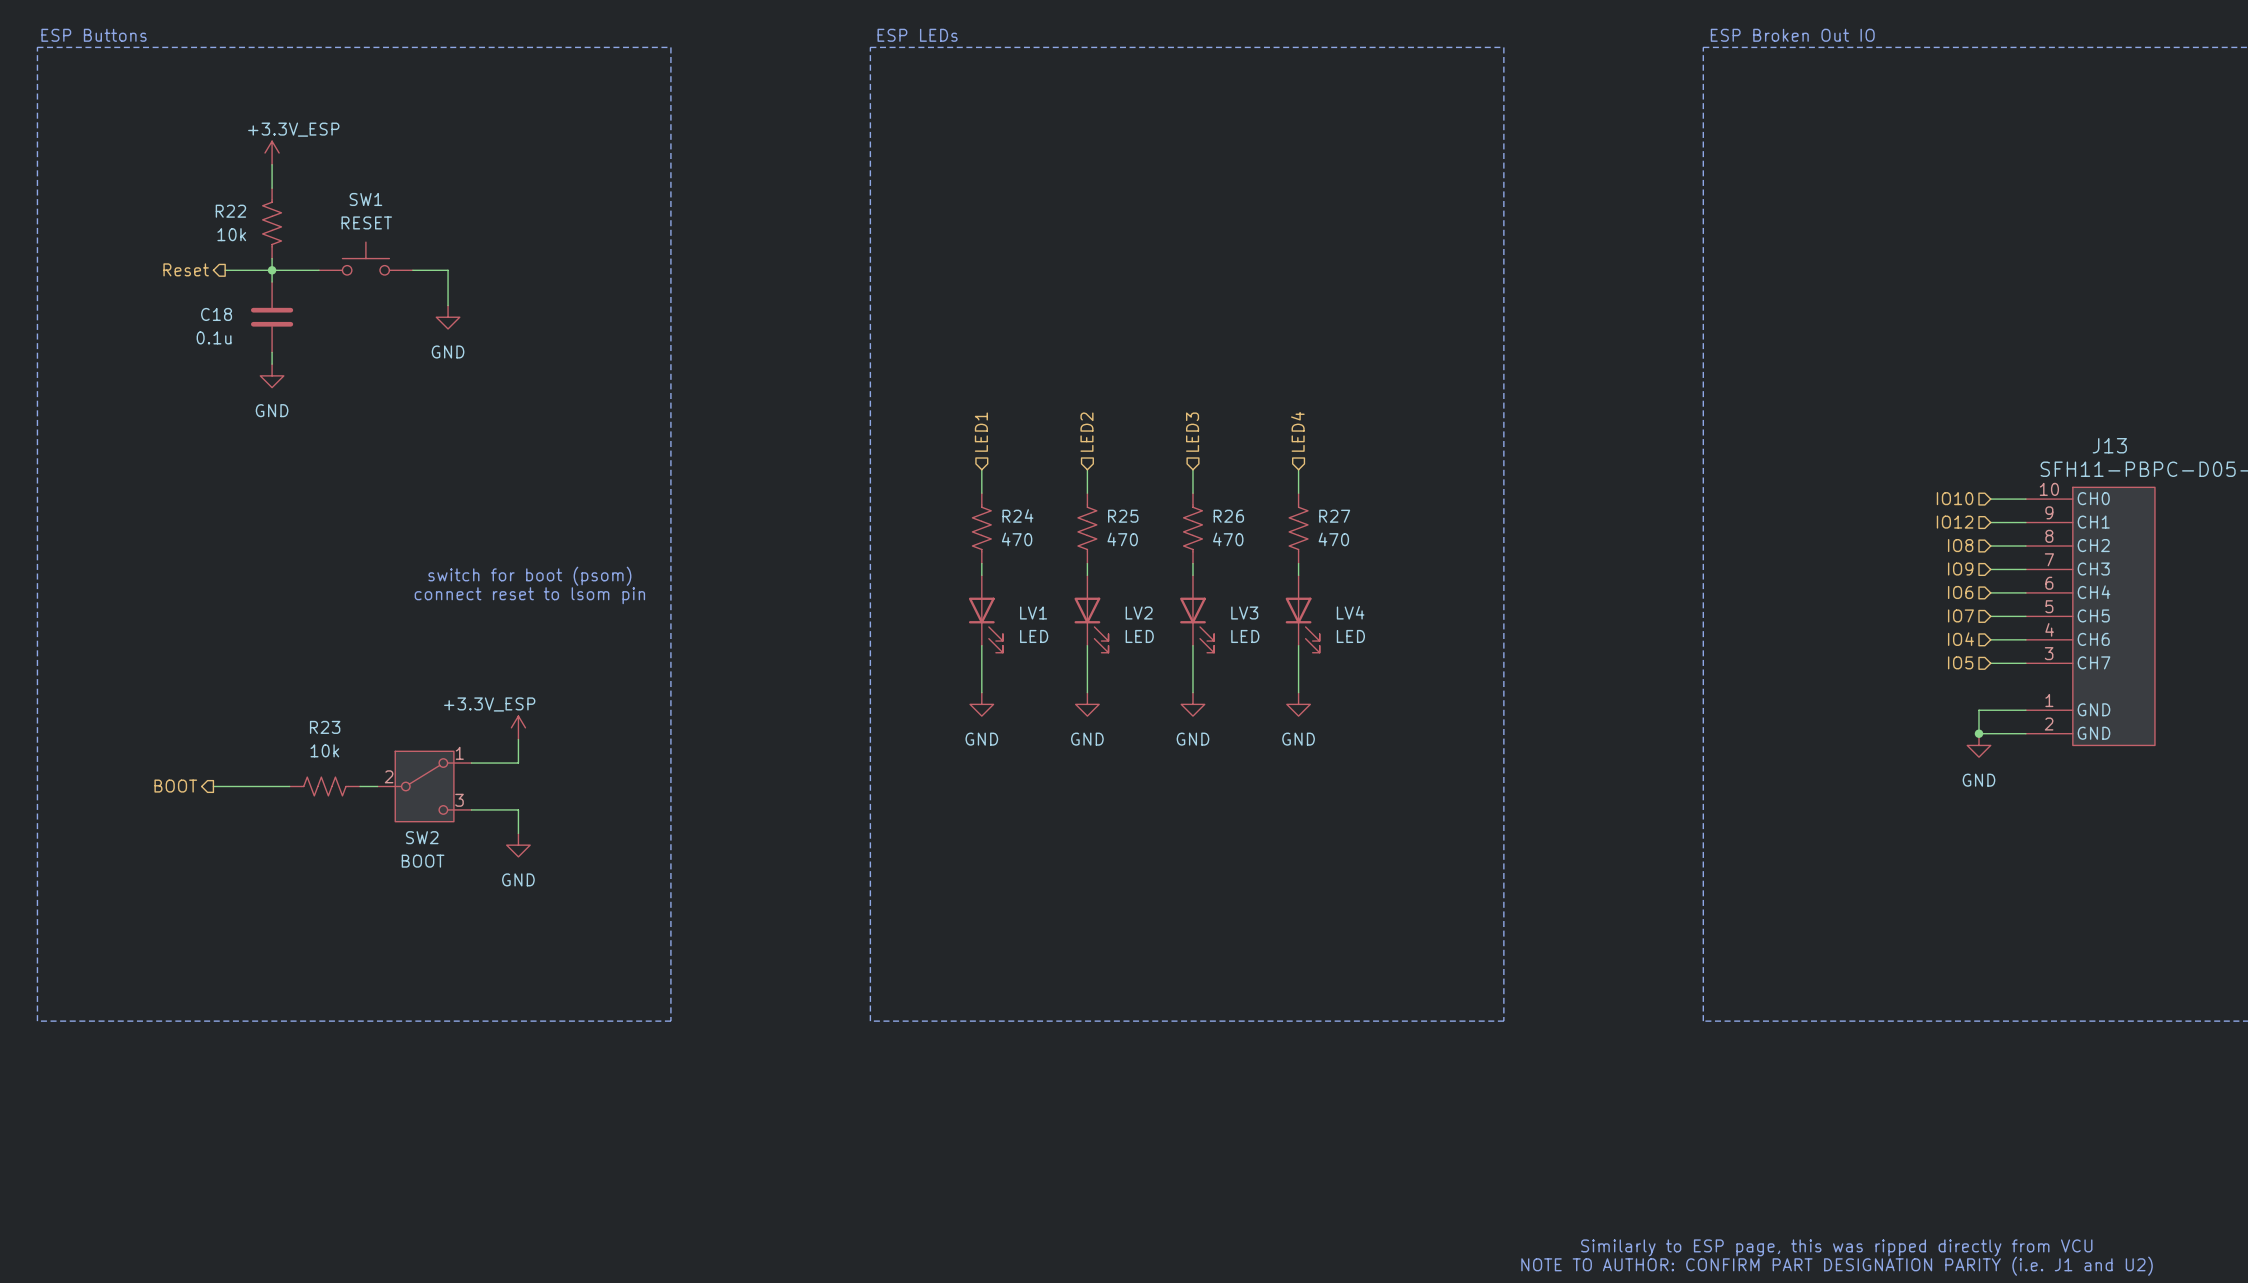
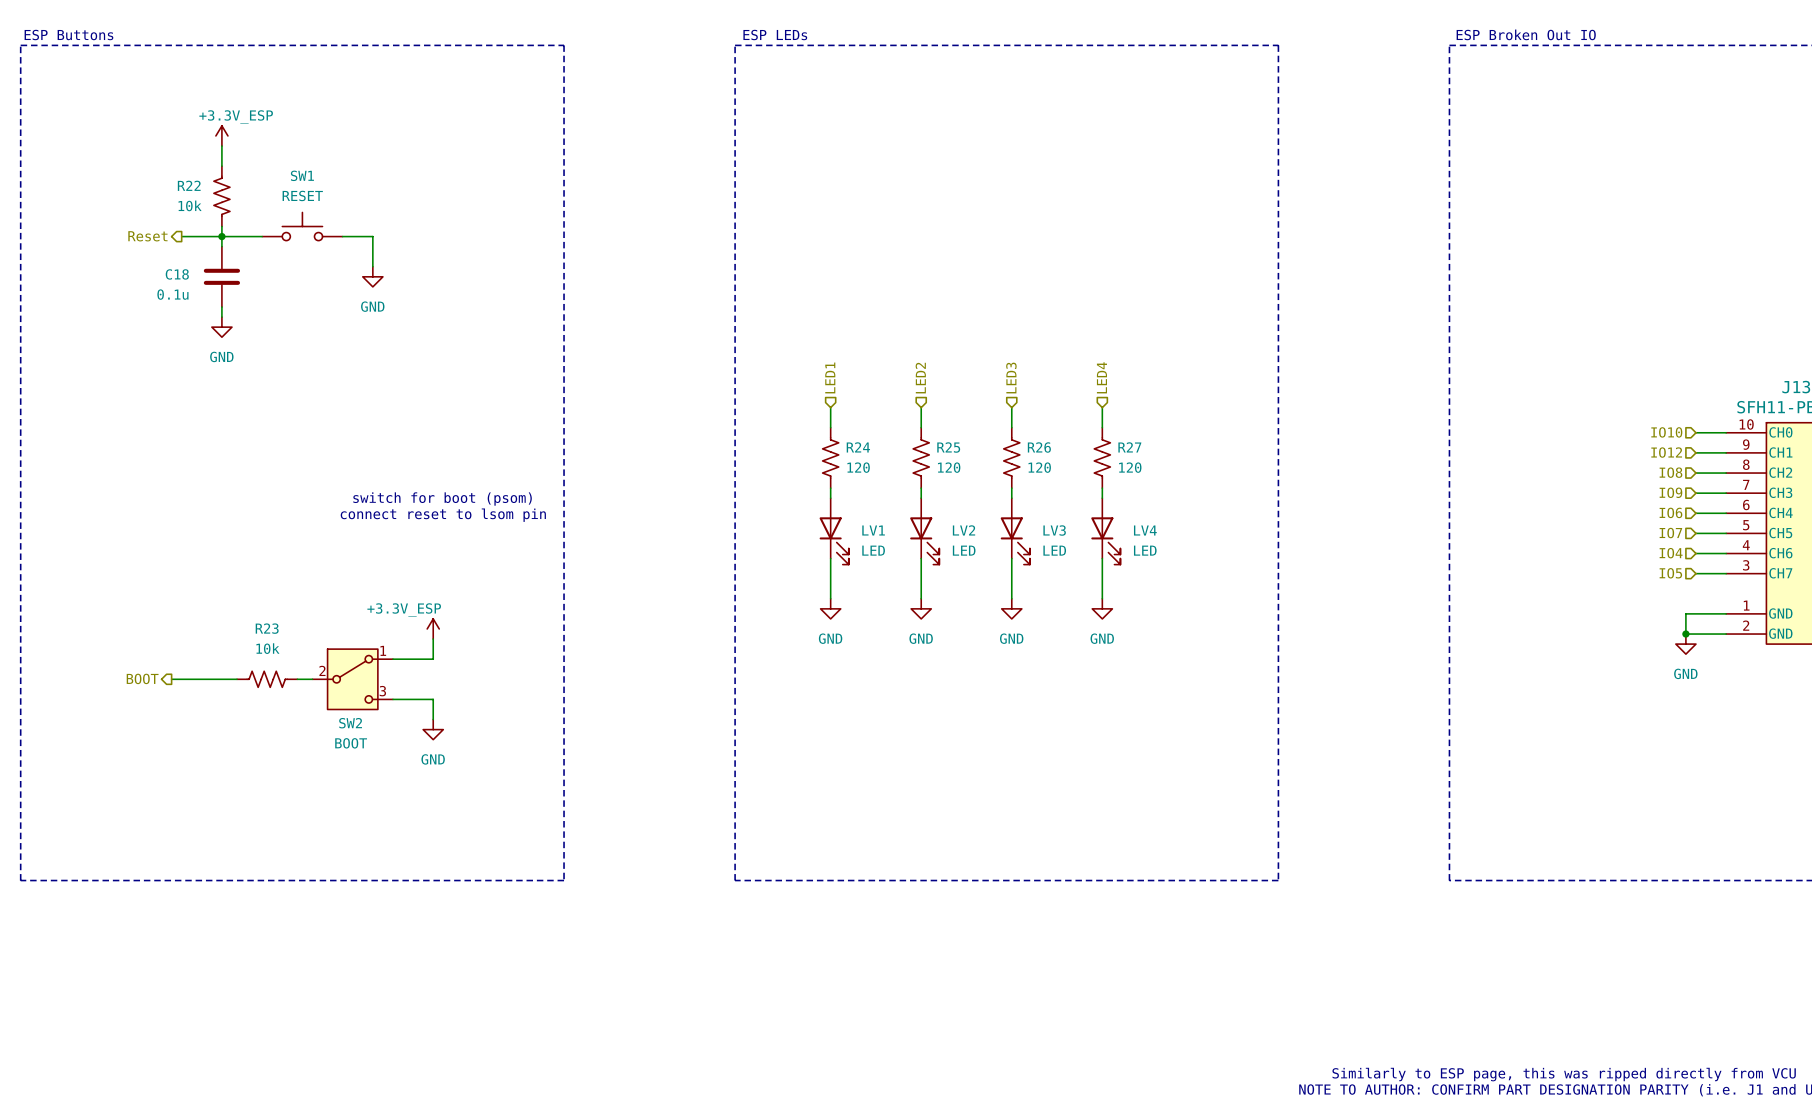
R24 value: 470 (1017, 539) -> 120 (858, 467)
R25 value: 470 (1122, 539) -> 120 (949, 467)
R26 value: 470 (1228, 539) -> 120 (1039, 467)
R27 value: 470 (1333, 539) -> 120 (1130, 467)

